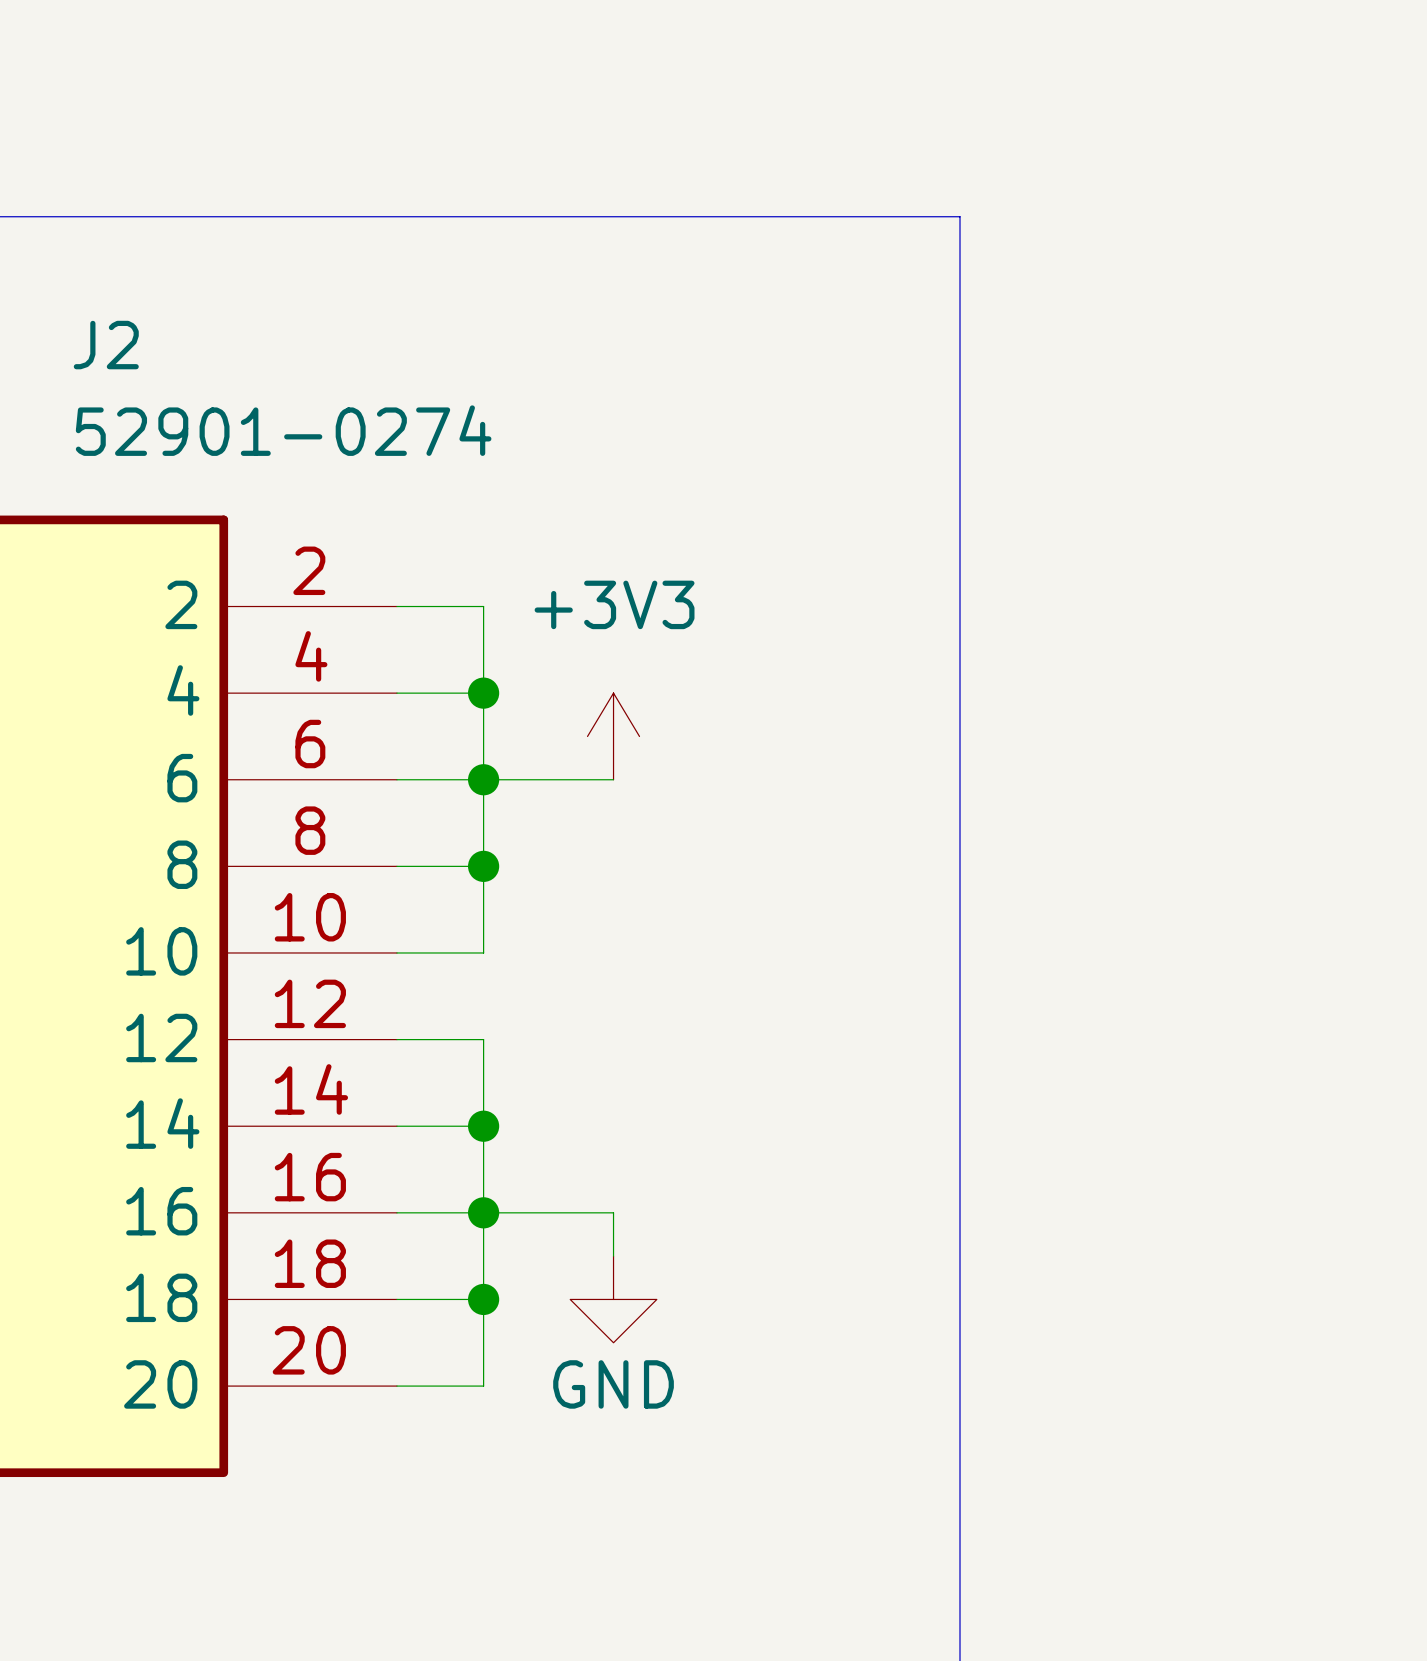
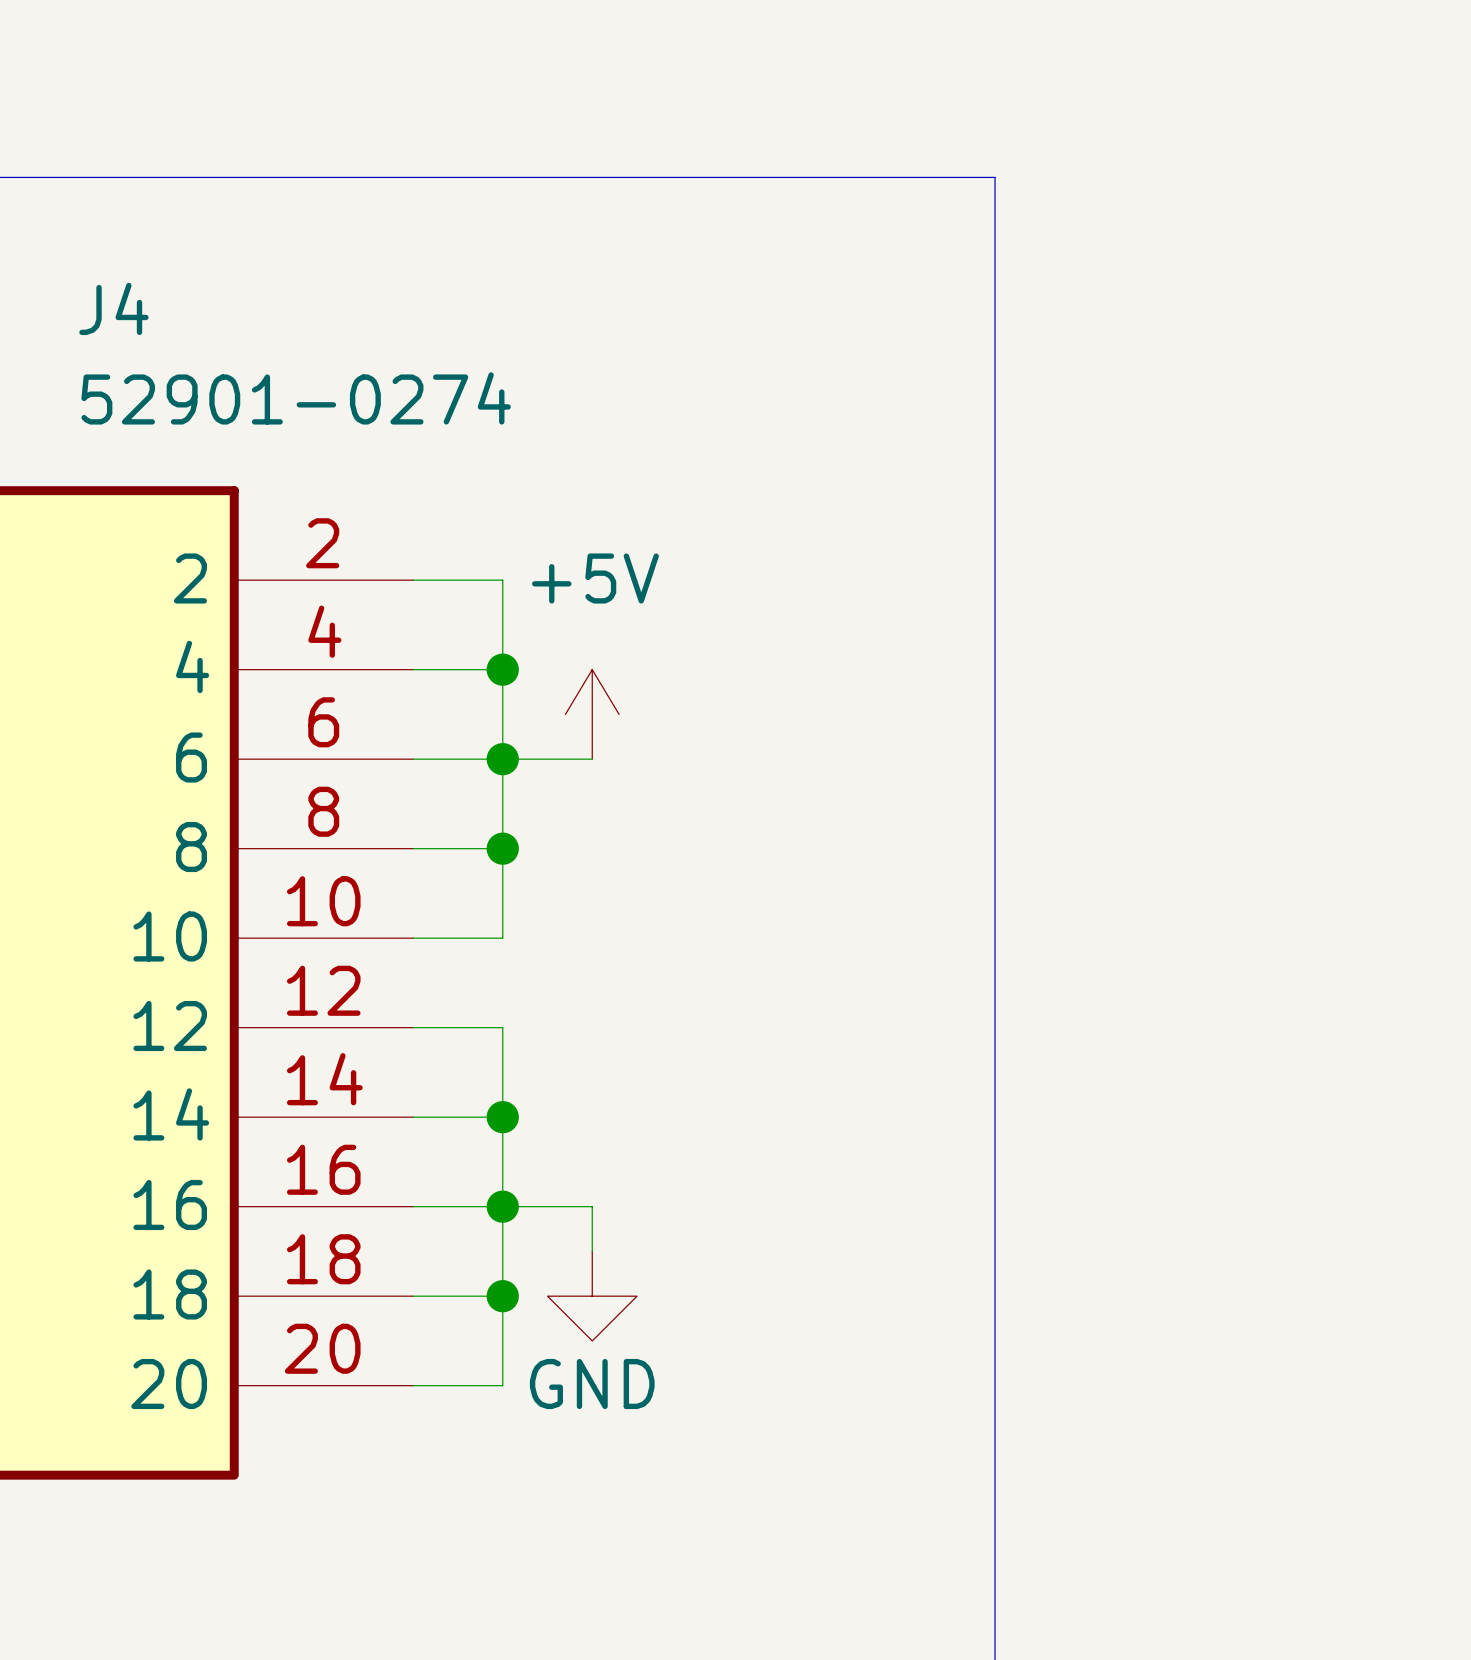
J2 name: J2 (106, 345) -> J4 (113, 308)
power symbol: none -> +5V (592, 714)
power symbol: +3V3 (613, 736) -> none
wire: (570, 779) (613, 779) -> none
wire: (570, 1212) (613, 1212) (613, 1256) -> (592, 1206) (592, 1251)
power symbol position: GND (613, 1299) -> GND (592, 1296)

